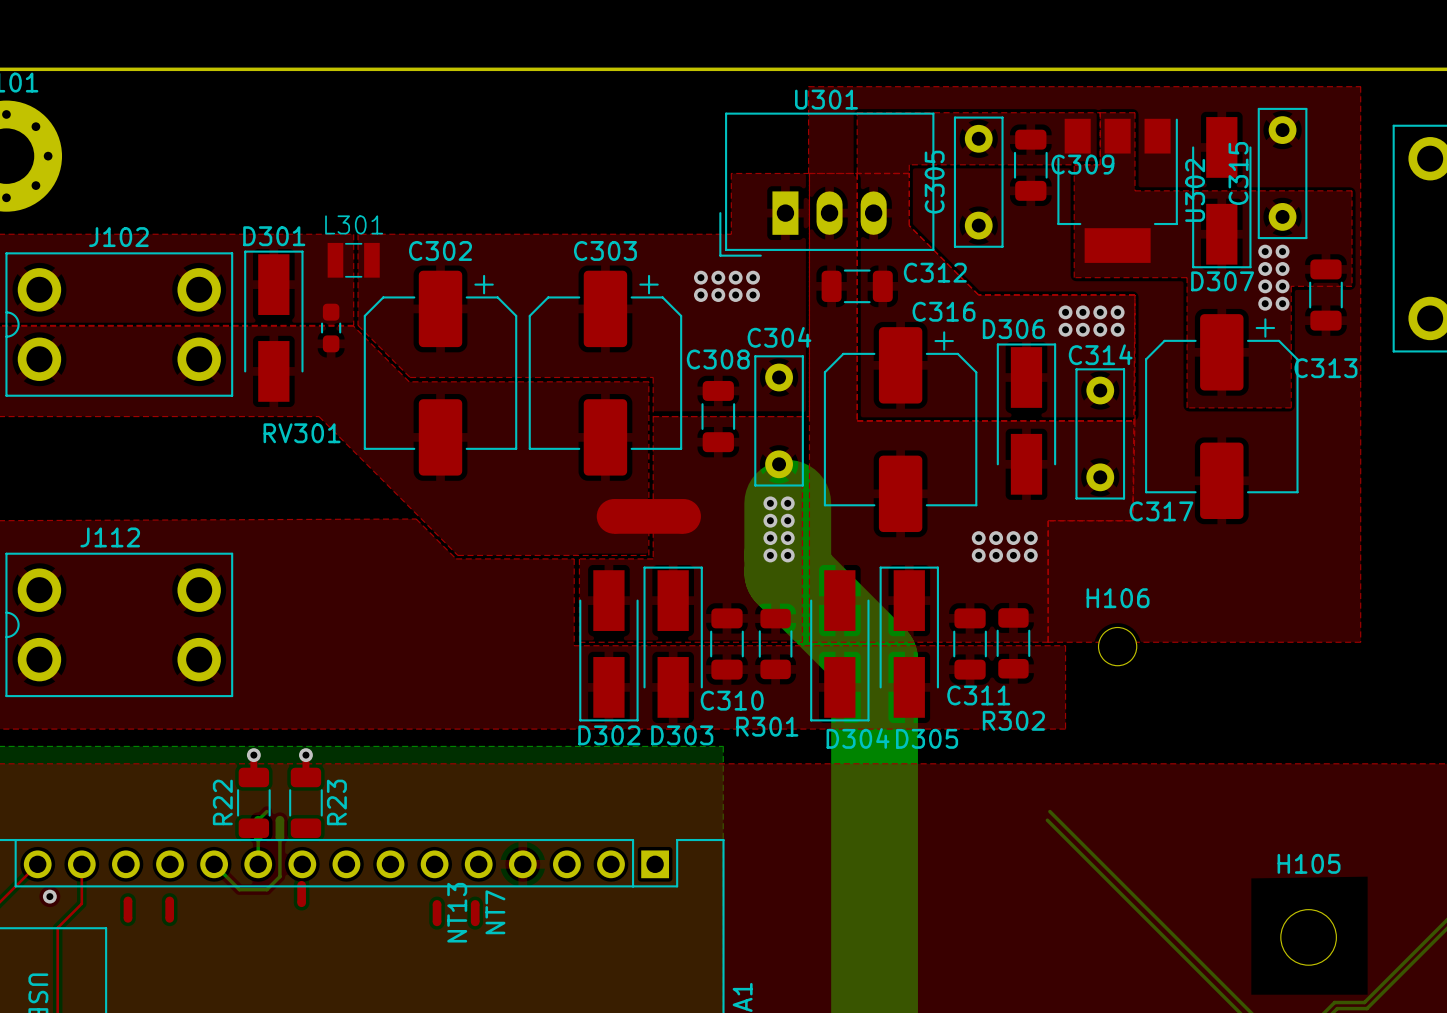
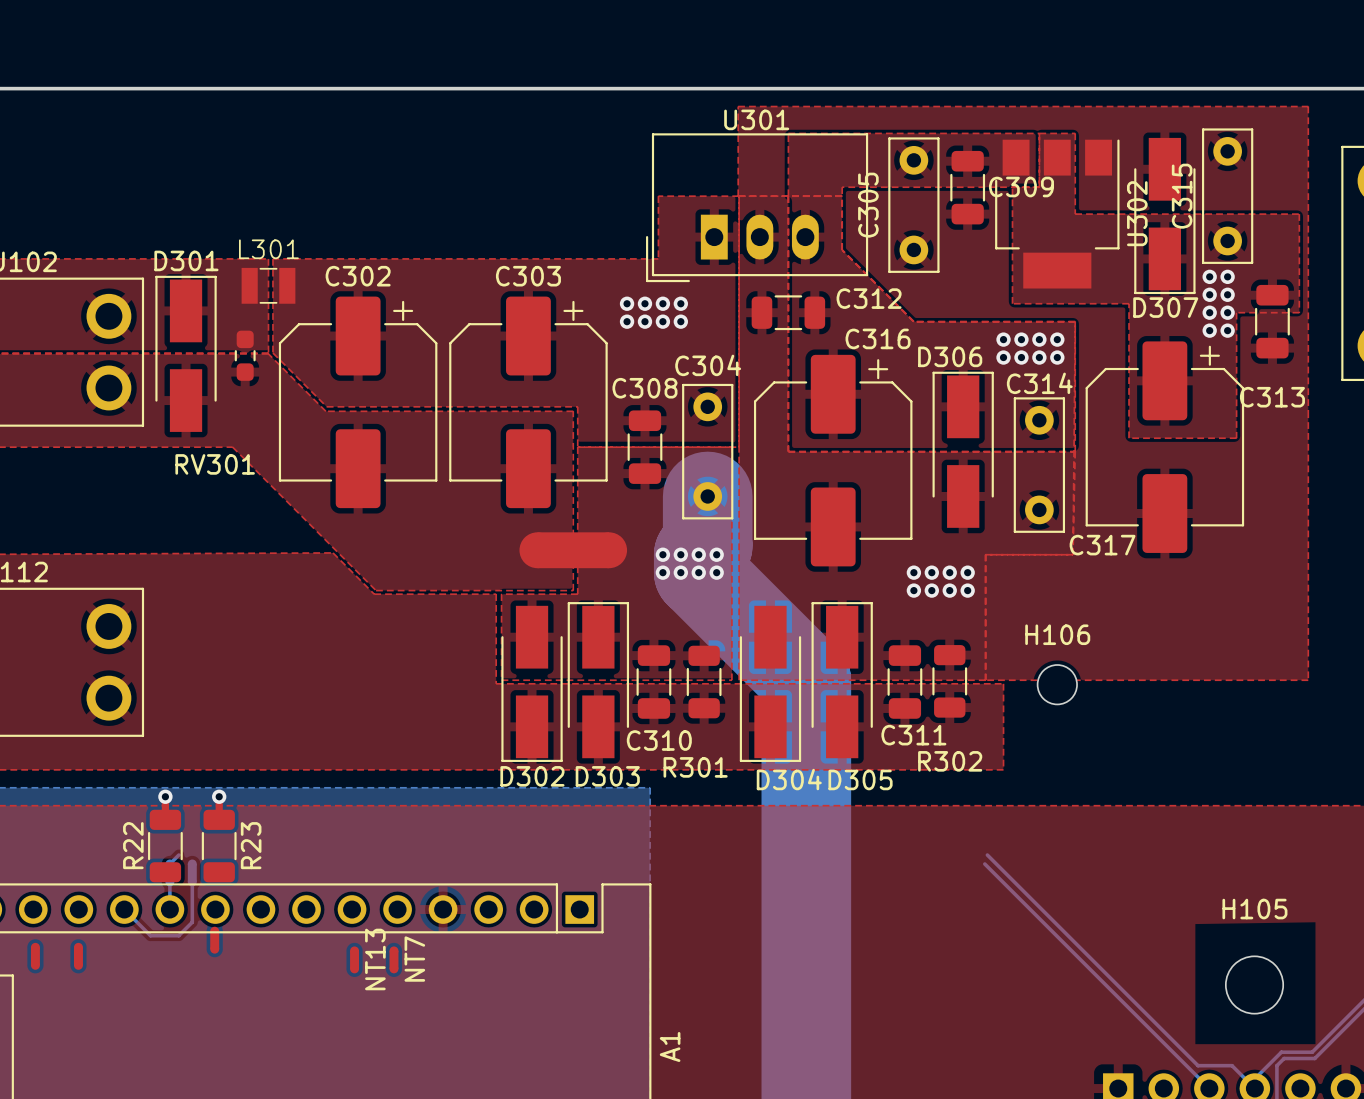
via: (770, 503) -> none
bottom track: (787, 503) (787, 572) (874, 659) -> (707, 496) (707, 545) (698, 554) (698, 572) (806, 680) (806, 698)
via: (787, 503) -> none
via: none -> (662, 554)
via: none -> (680, 554)
via: none -> (662, 572)
via: none -> (680, 572)
via: (770, 555) -> none
via: (787, 555) -> none

